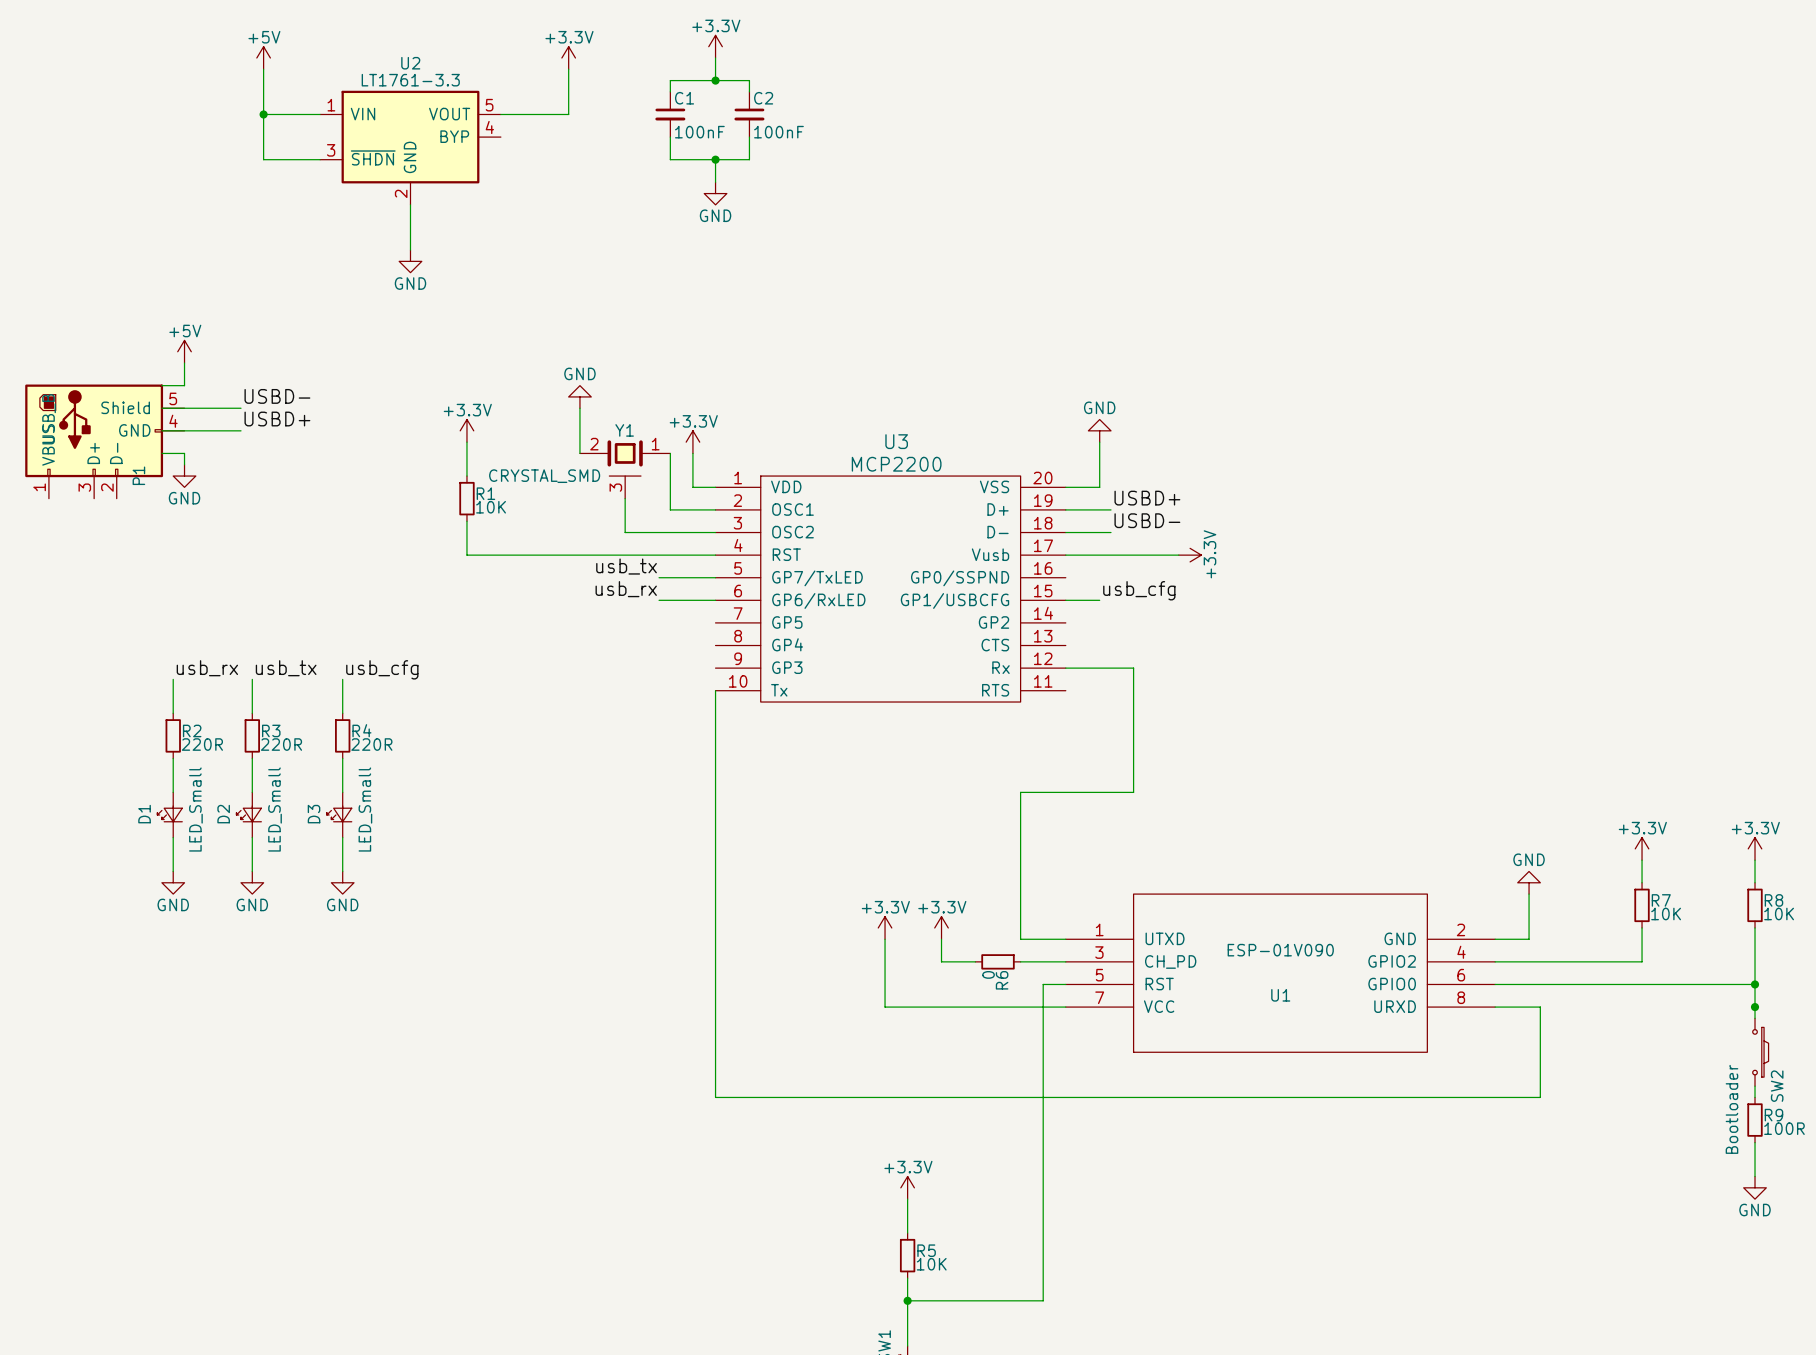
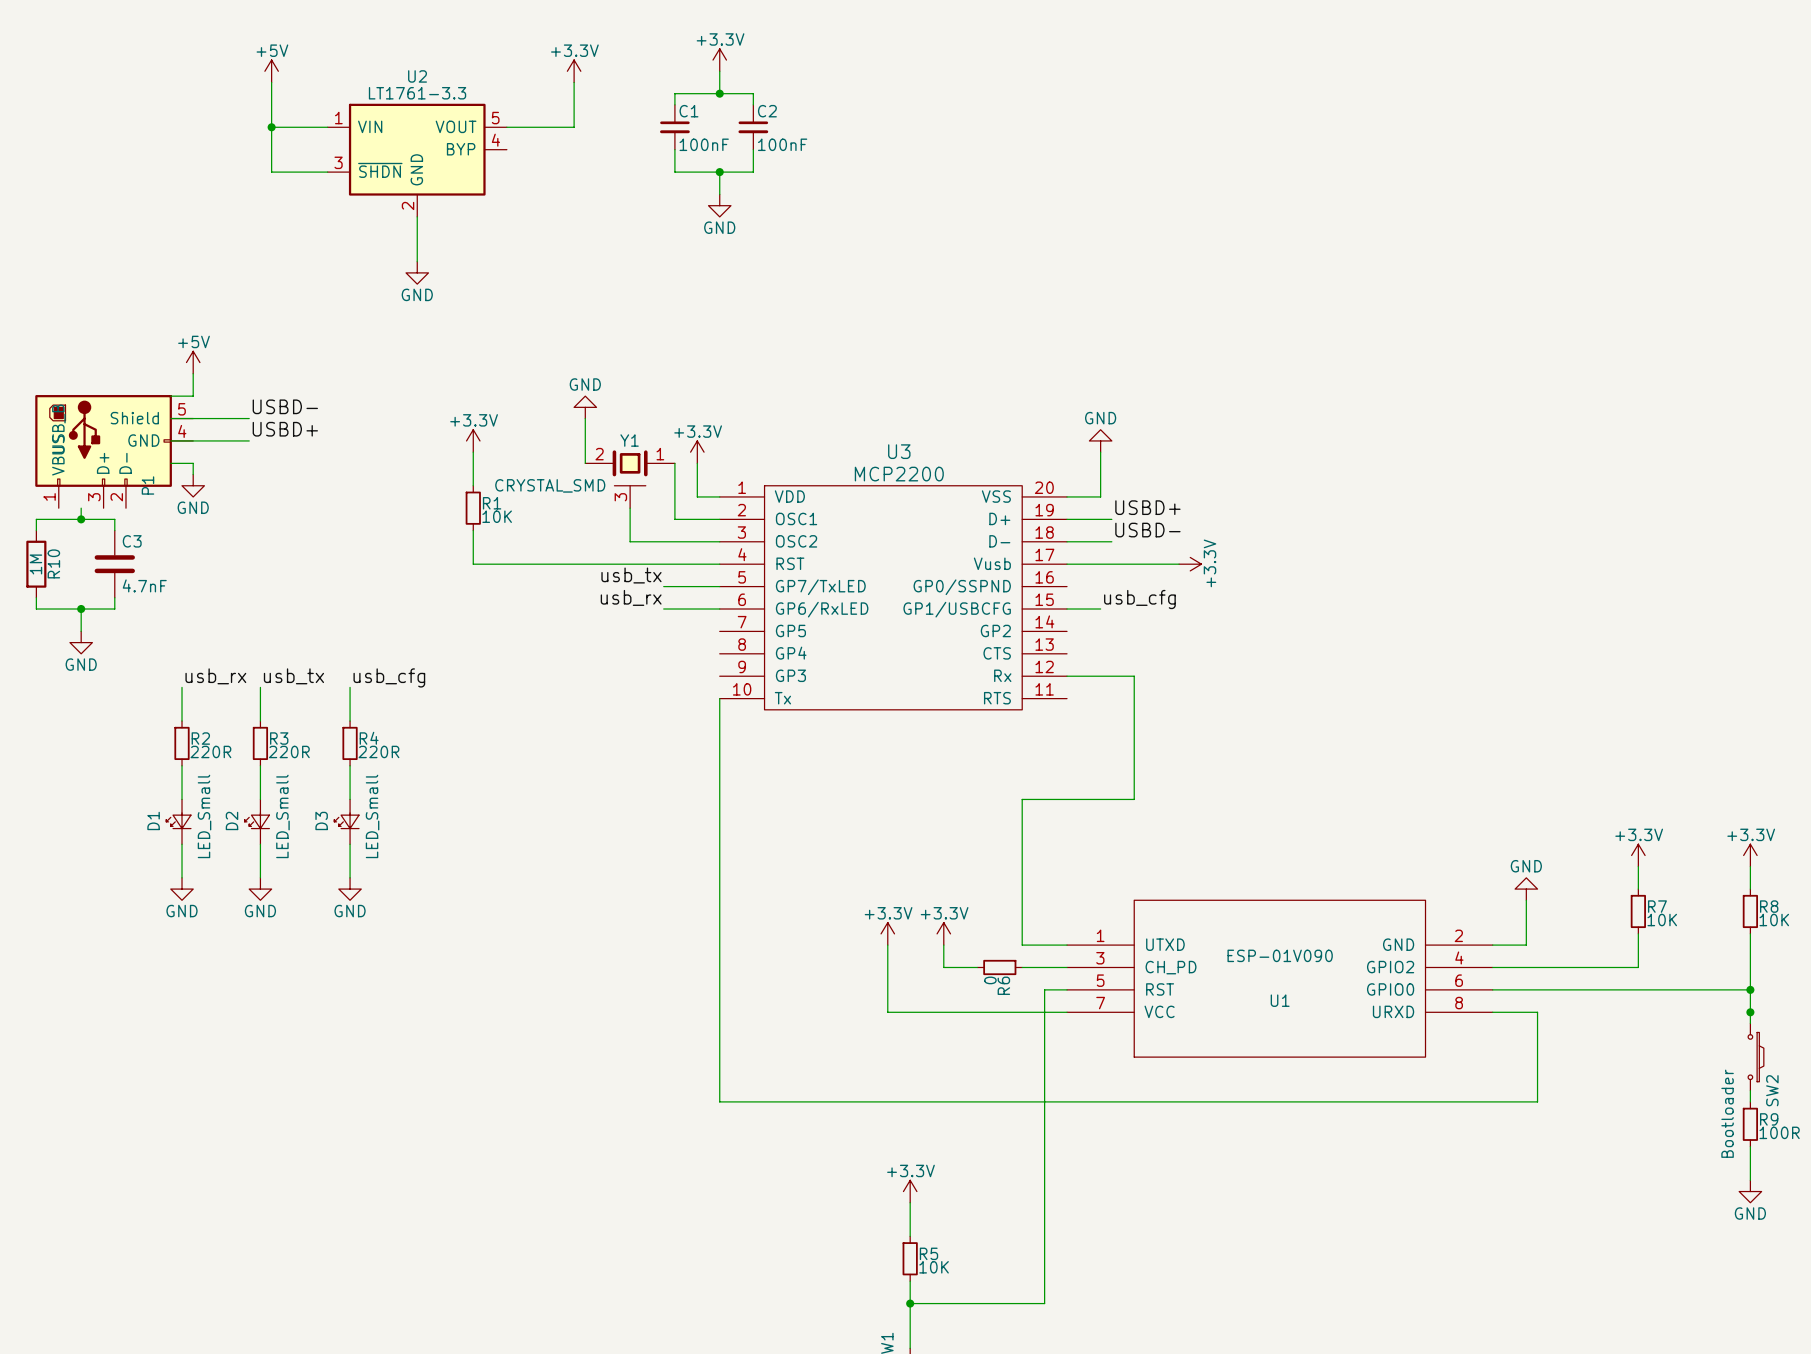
wire: none -> (81, 508) (81, 519)
junction: none -> (81, 519)
wire: none -> (36, 530) (36, 519) (114, 519) (114, 530)
R10: none -> 1M (36, 564)
C3: none -> 4.7nF (114, 564)
wire: none -> (36, 597) (36, 609) (114, 609) (114, 597)
wire: none -> (81, 609) (81, 631)
junction: none -> (81, 609)
power symbol: none -> GND (81, 642)

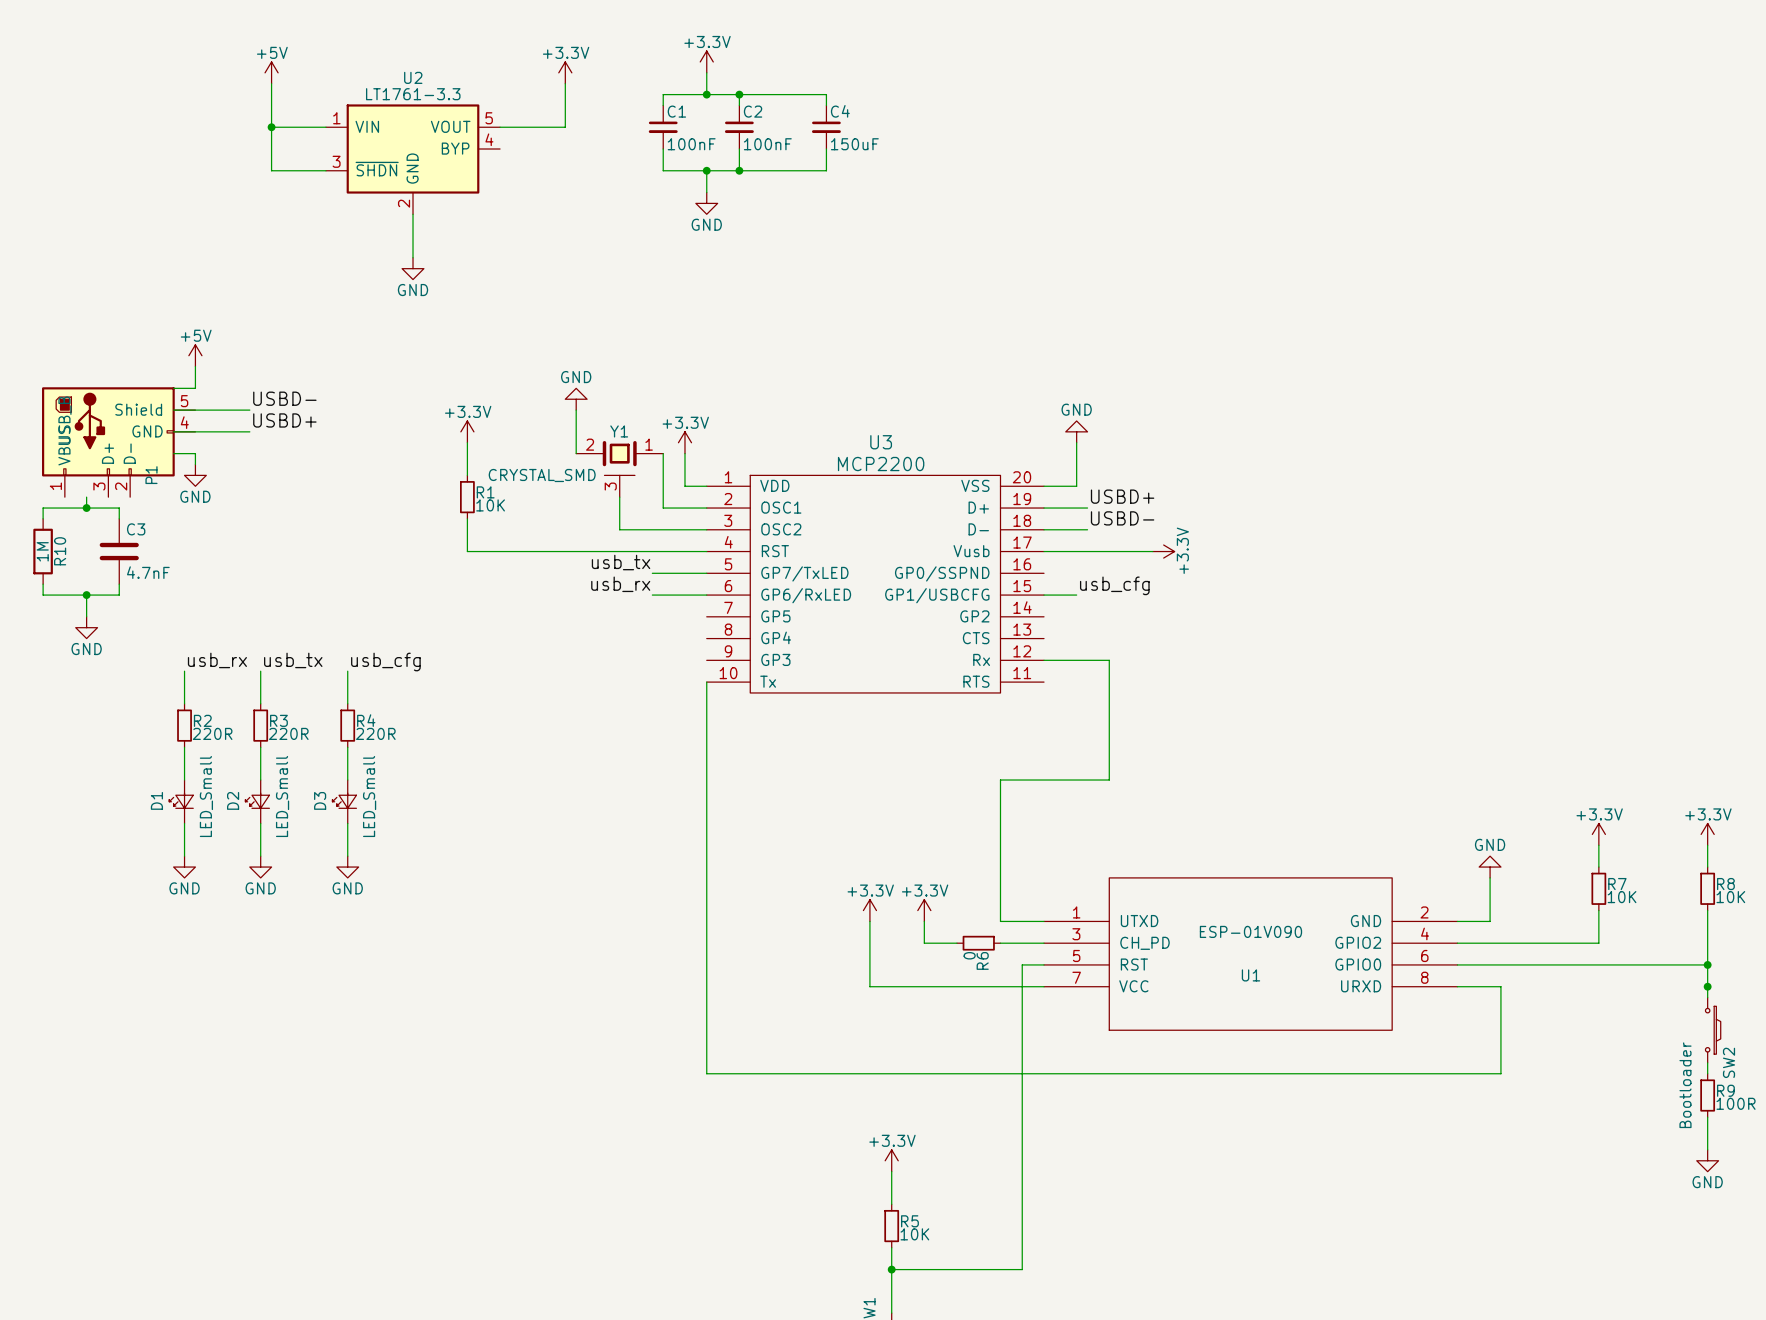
wire: none -> (739, 94) (826, 94) (826, 105)
junction: none -> (739, 94)
C4: none -> 150uF (826, 127)
wire: none -> (826, 149) (826, 170) (739, 170)
junction: none -> (739, 170)

